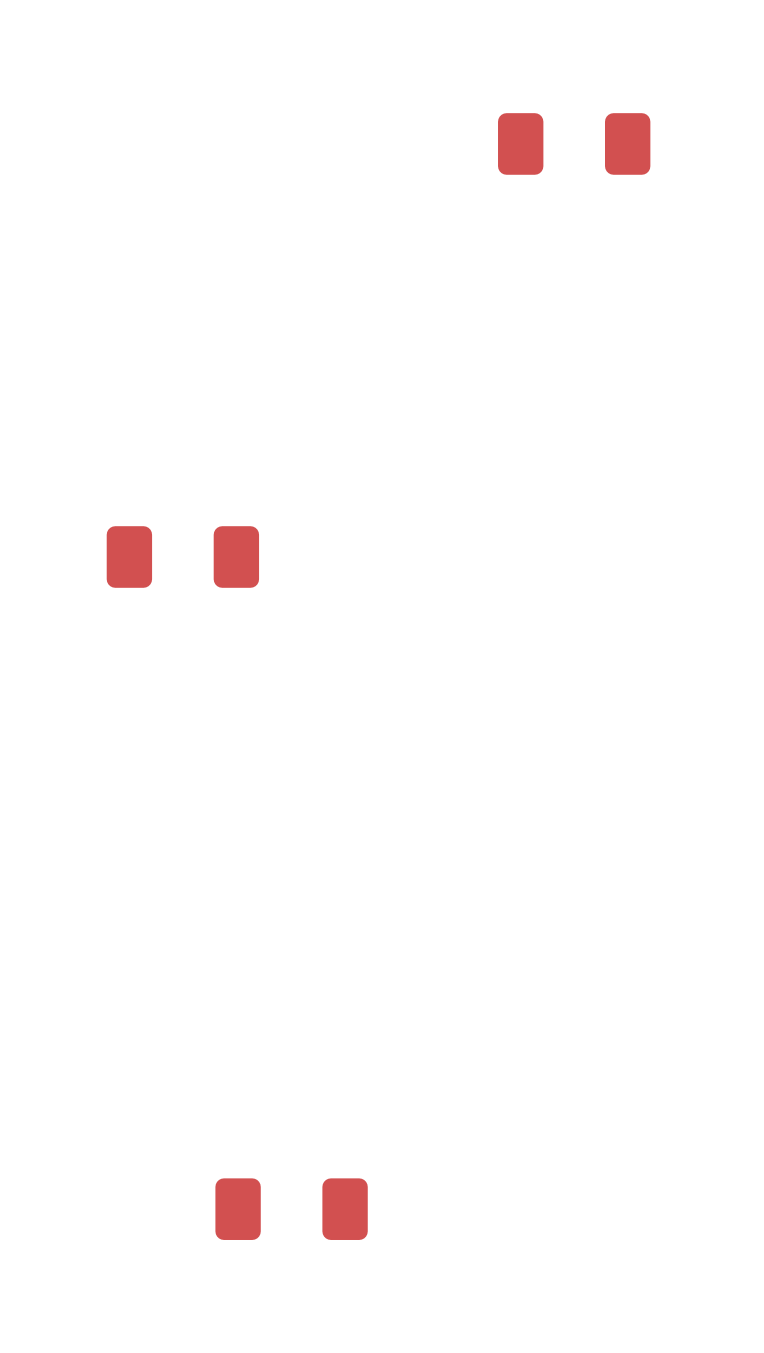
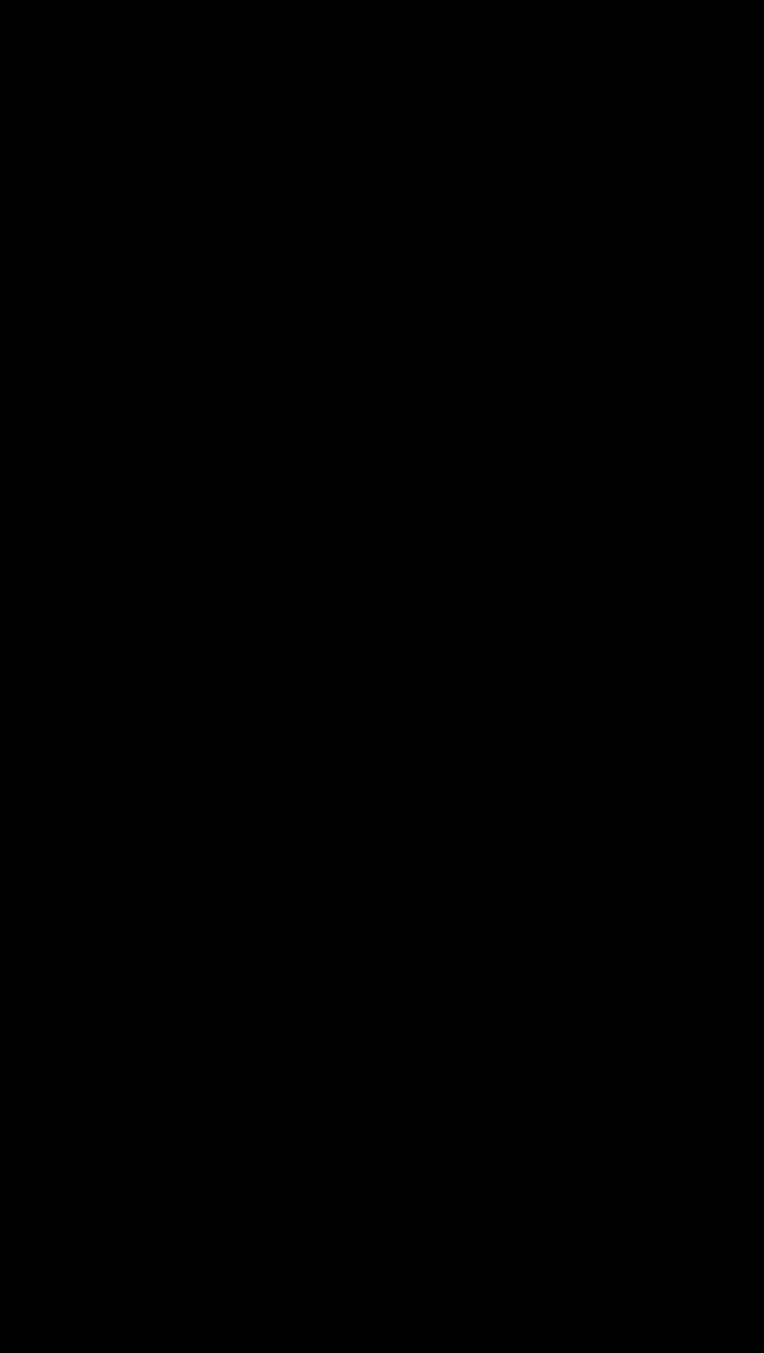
part: (574, 143) -> none
part: (182, 557) -> none
part: (291, 1209) -> none

